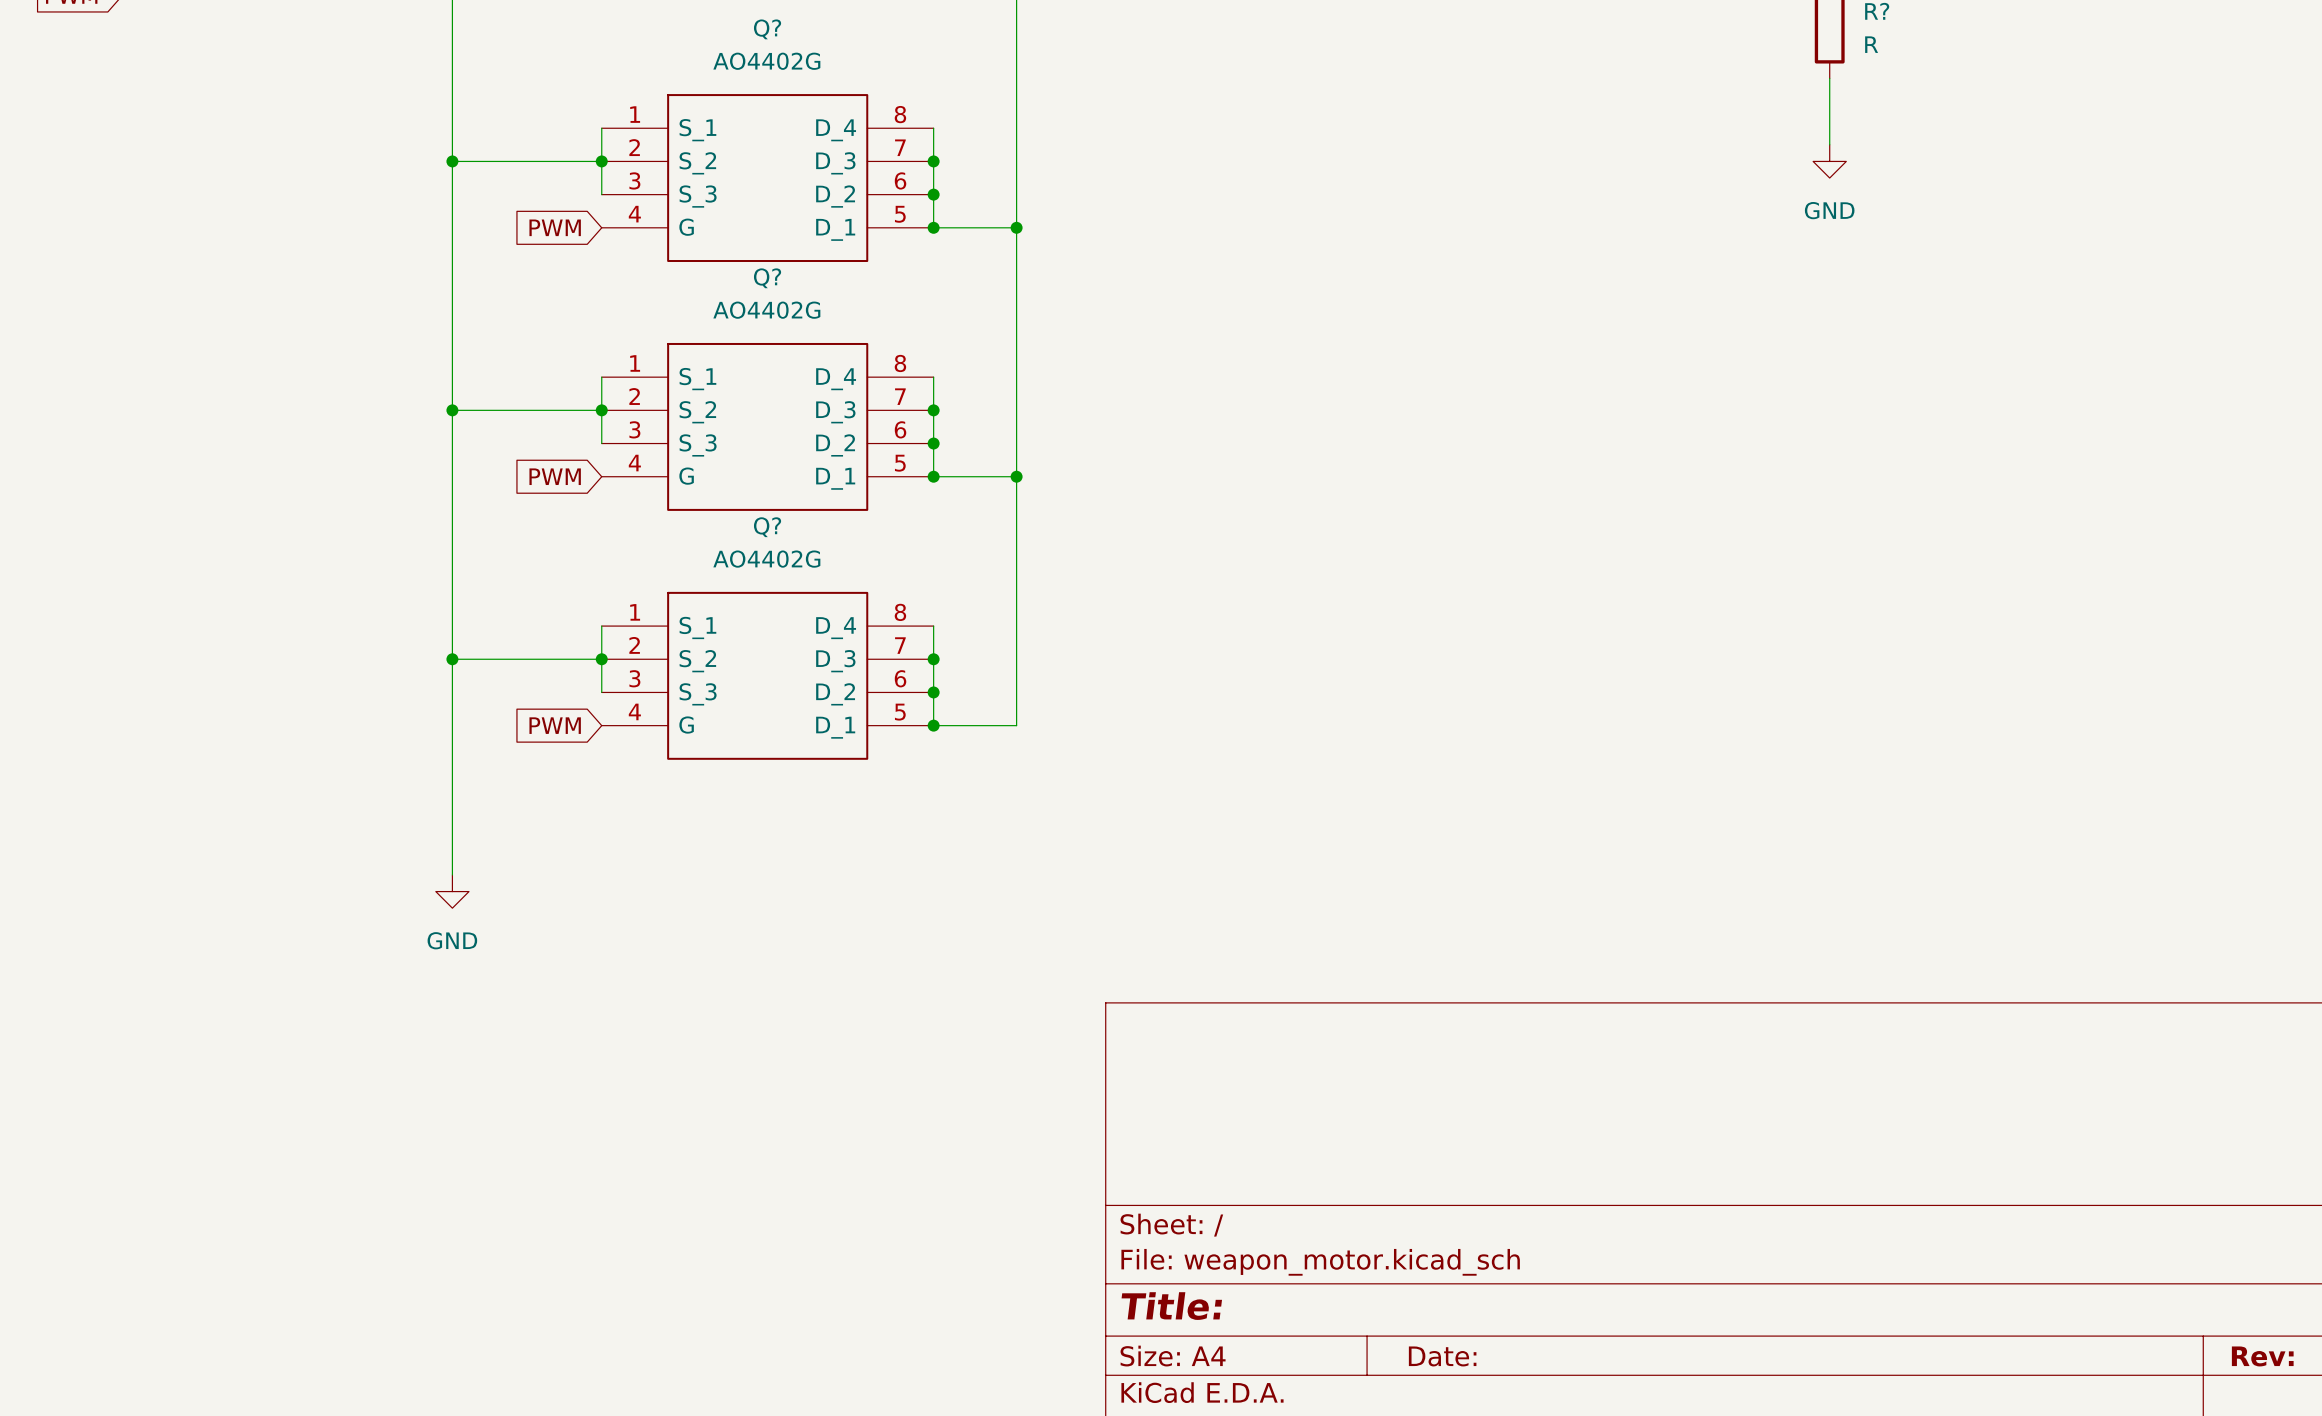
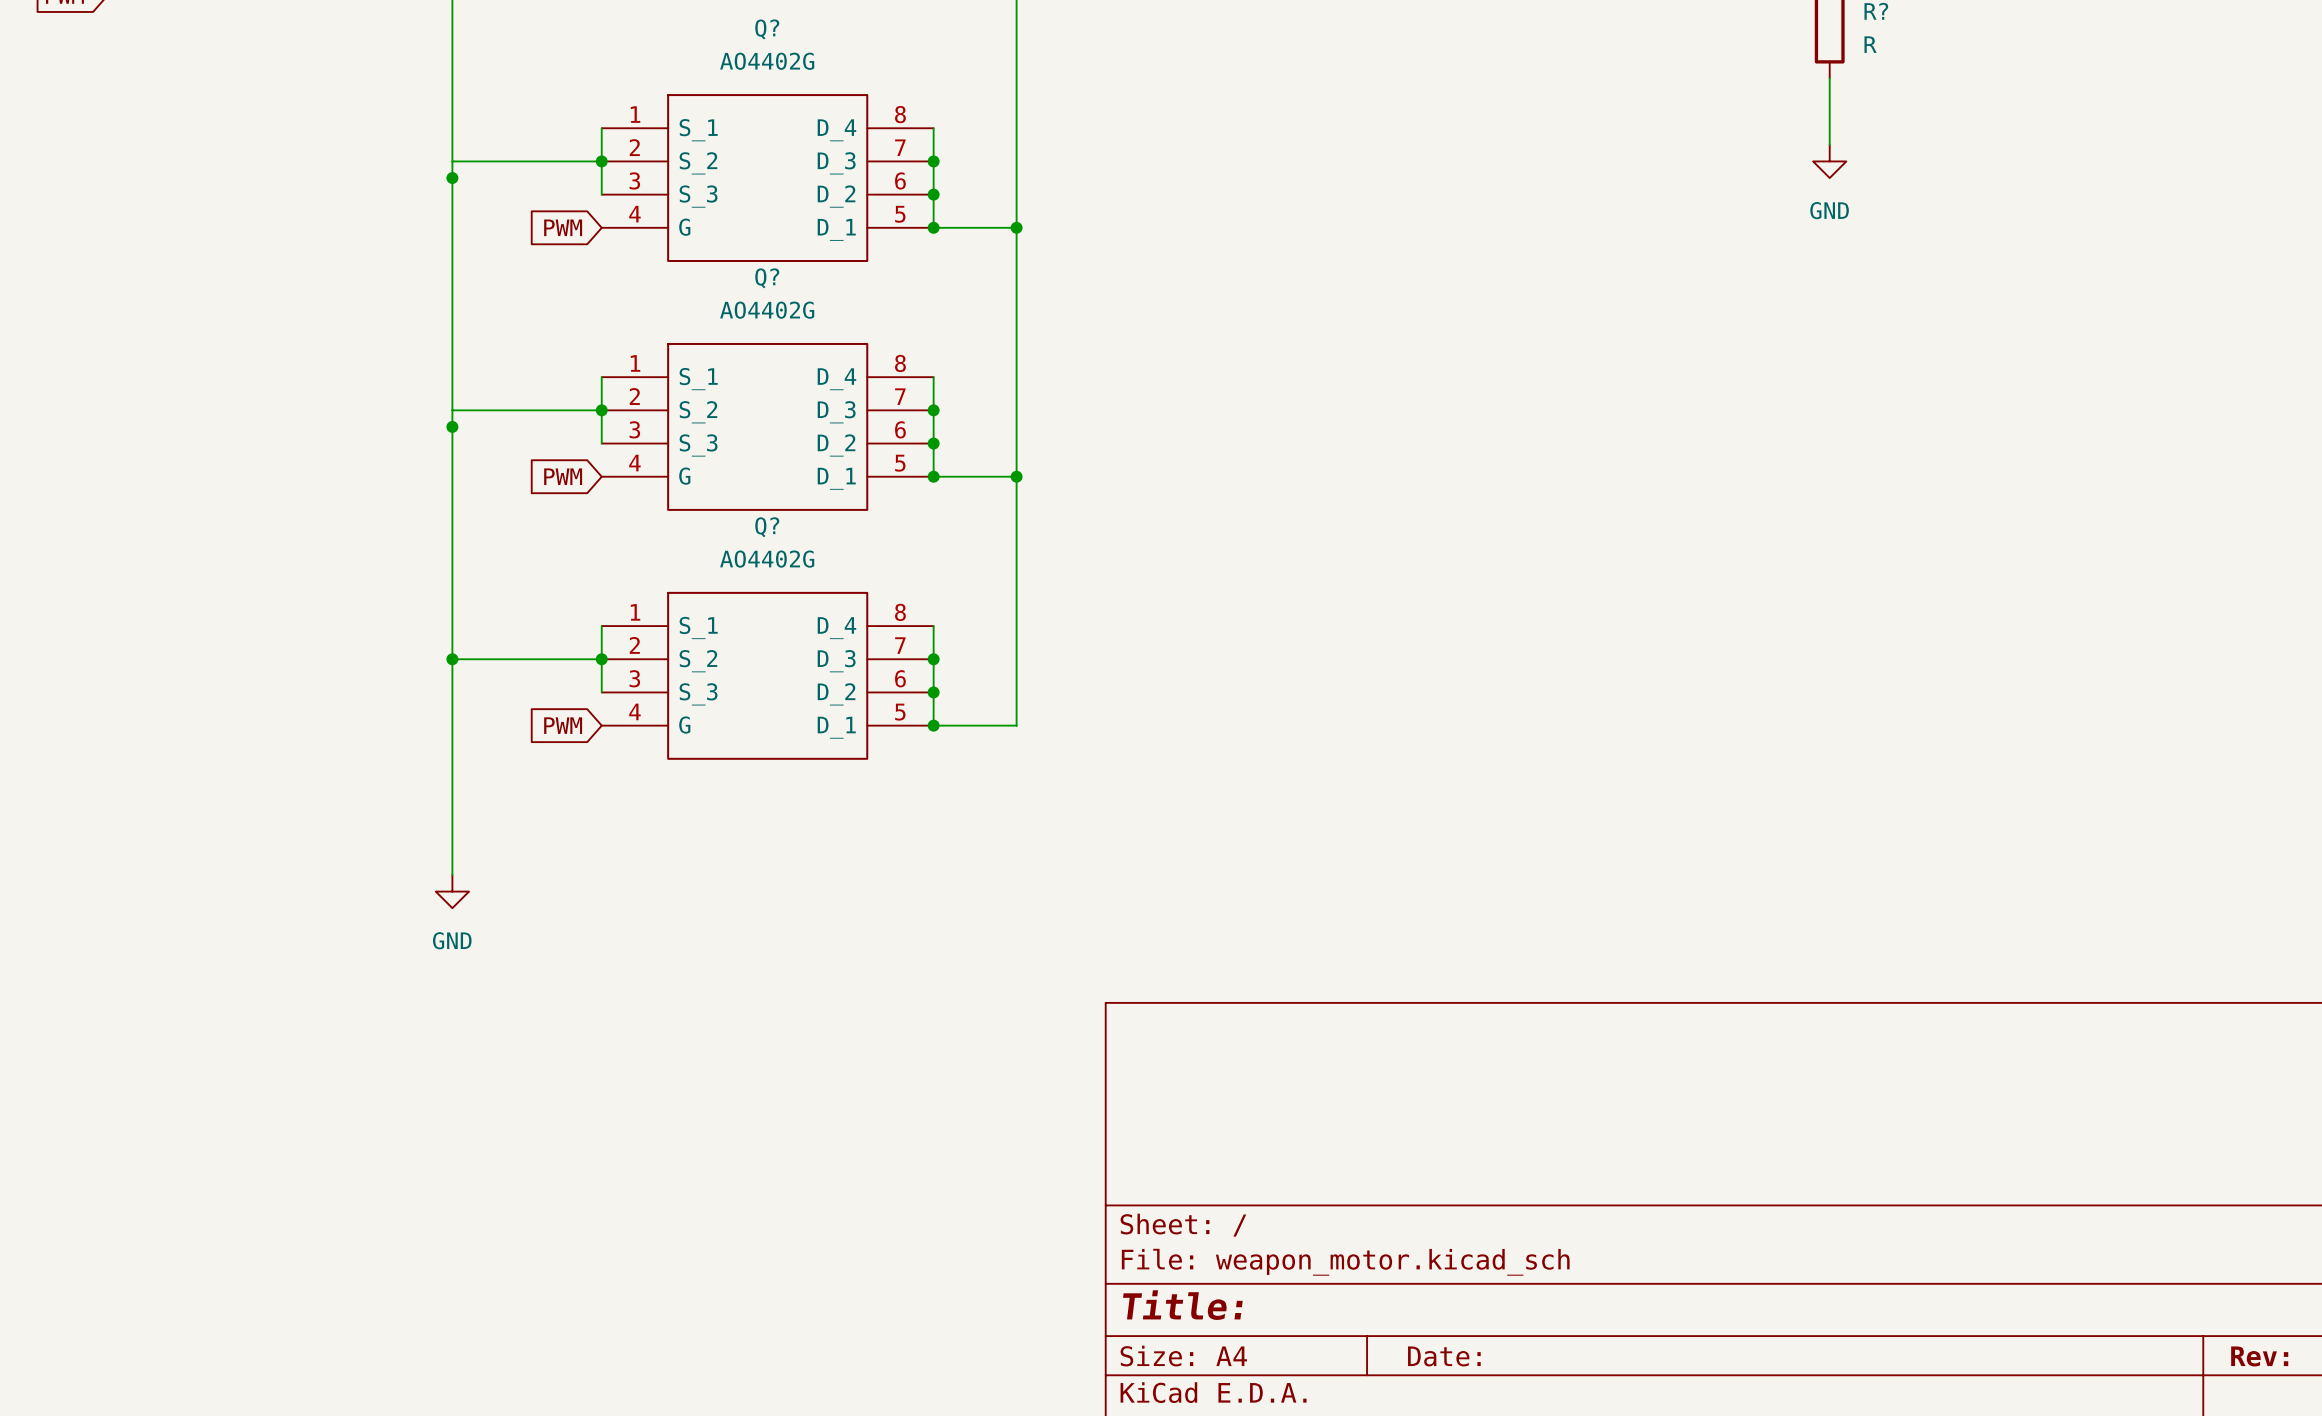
junction position: (452, 161) -> (452, 178)
junction position: (452, 410) -> (452, 426)

